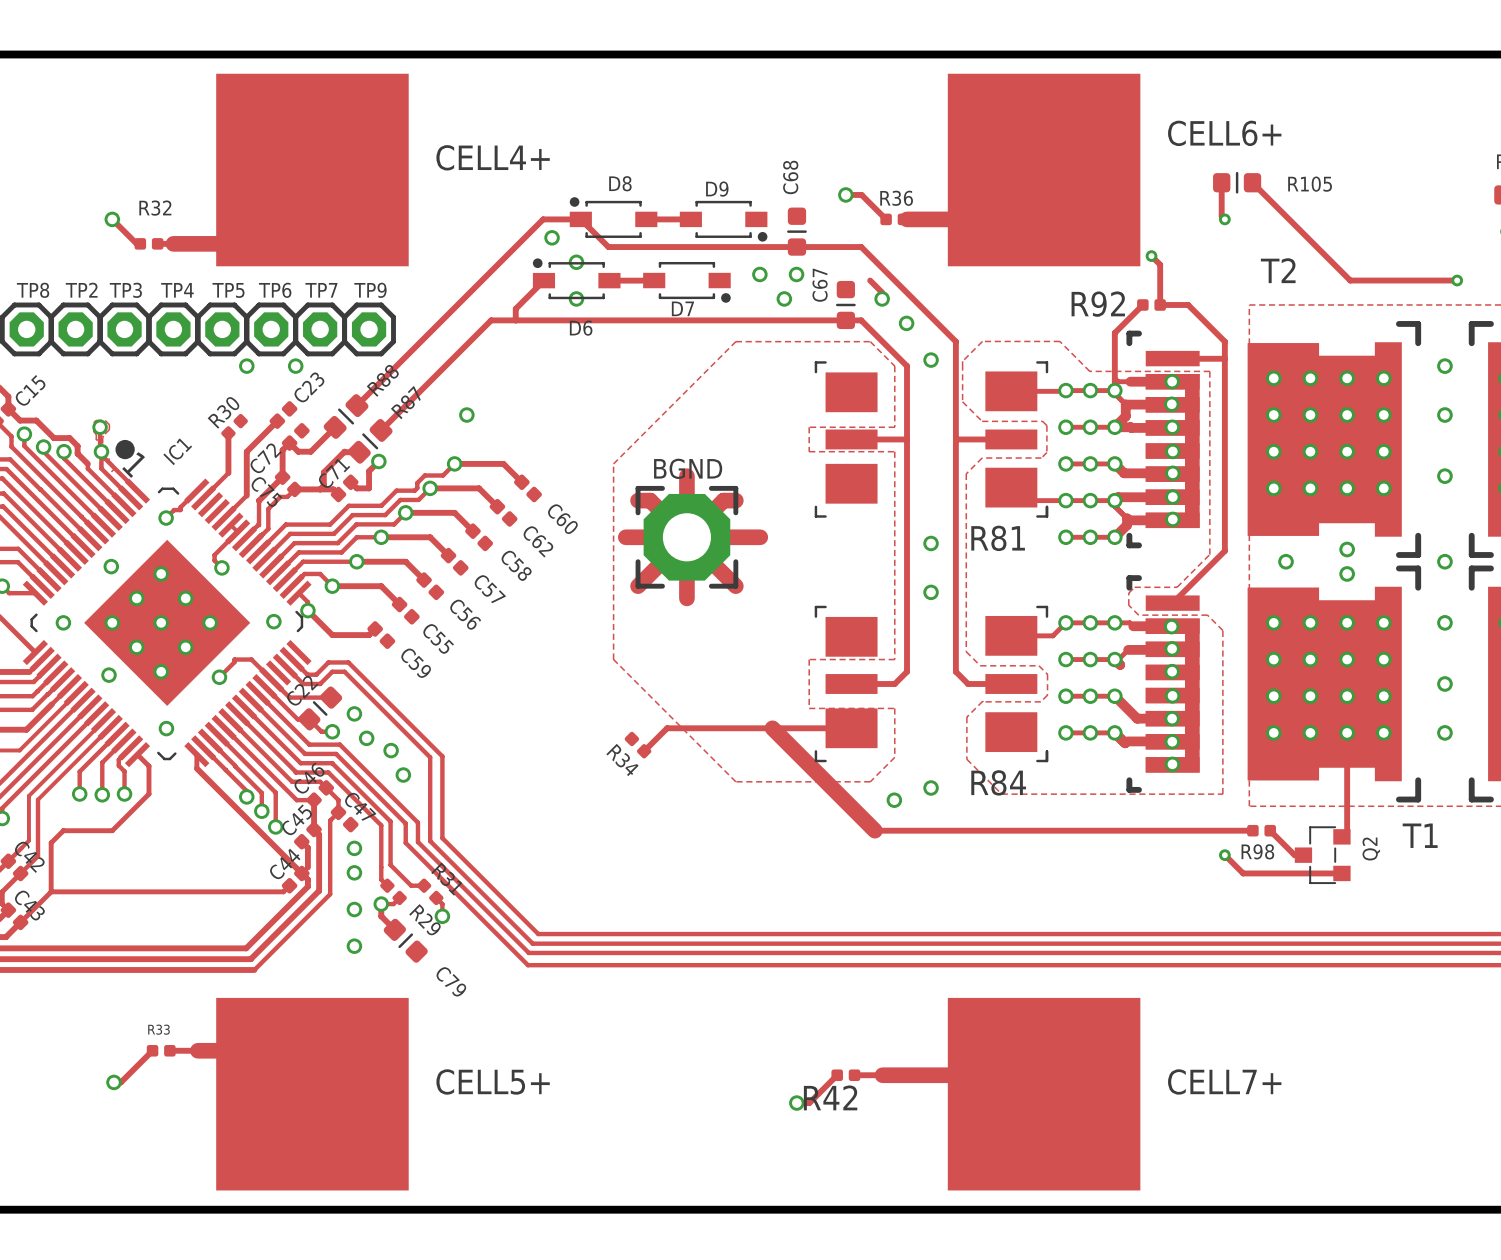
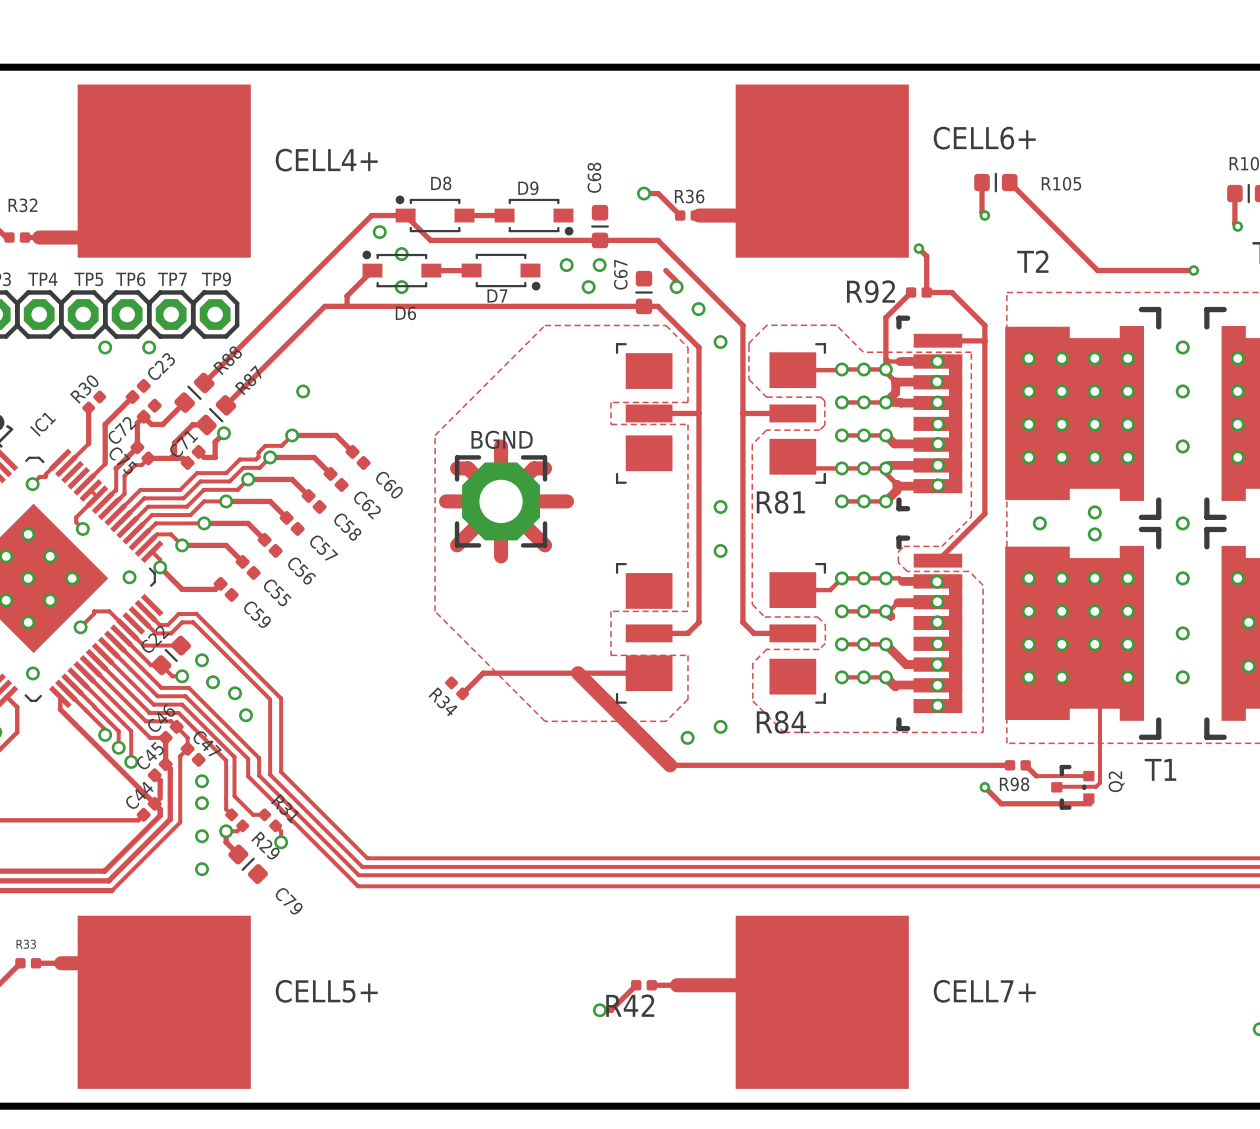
track: none -> (1037, 633) (1099, 695) (1099, 782) (1096, 786) (1056, 787)
track: (1347, 732) (1347, 831) (1341, 836) -> none
via: (1347, 732) -> none
Q2 footprint: [1294, 826, 1351, 885] -> [1051, 764, 1095, 810]
track: (1282, 842) (1294, 855) (1303, 855) -> (1036, 776) (1088, 776)

